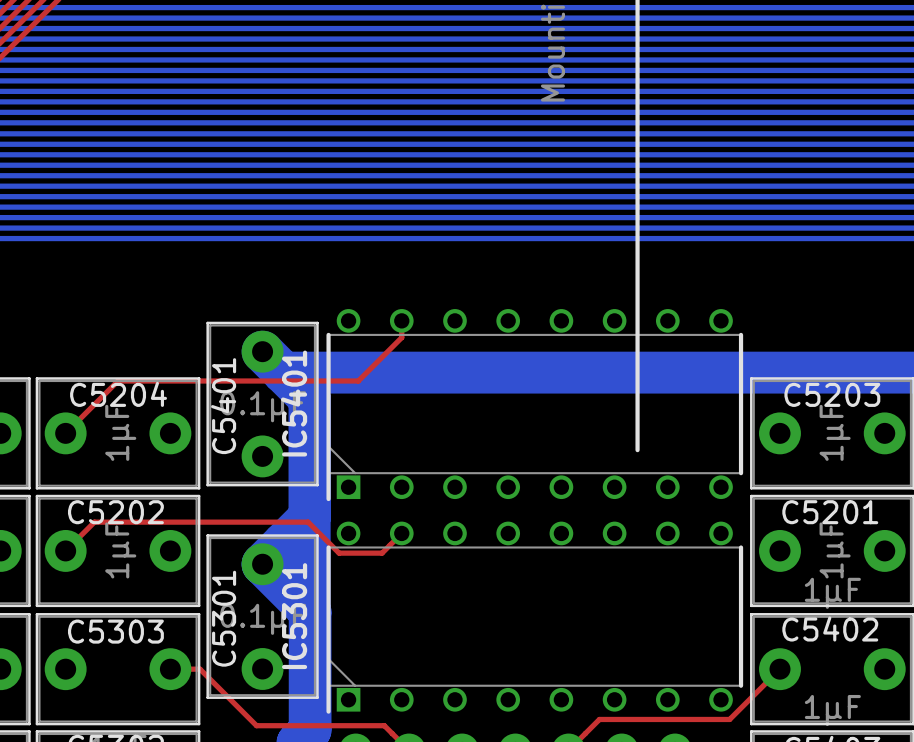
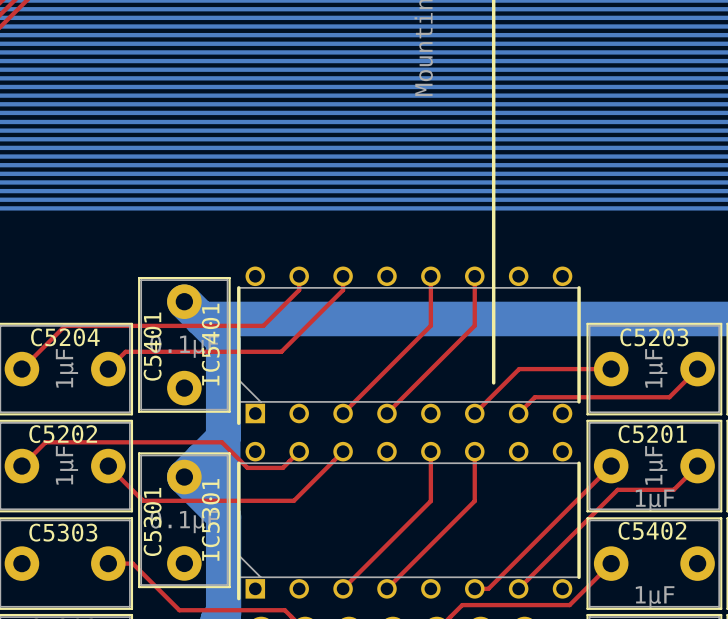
top track: none -> (343, 276) (343, 290) (281, 351) (125, 351) (108, 369)
top track: none -> (430, 276) (430, 325) (343, 413)
top track: none -> (474, 276) (474, 325) (386, 413)
top track: none -> (611, 369) (519, 369) (474, 413)
top track: none -> (697, 369) (669, 397) (534, 397) (518, 413)
top track: none -> (343, 451) (293, 500) (143, 500) (108, 466)
top track: none -> (430, 451) (430, 501) (343, 588)
top track: none -> (474, 451) (474, 501) (386, 588)
top track: none -> (611, 466) (488, 588) (474, 588)
top track: none -> (697, 466) (673, 489) (617, 489) (518, 588)

